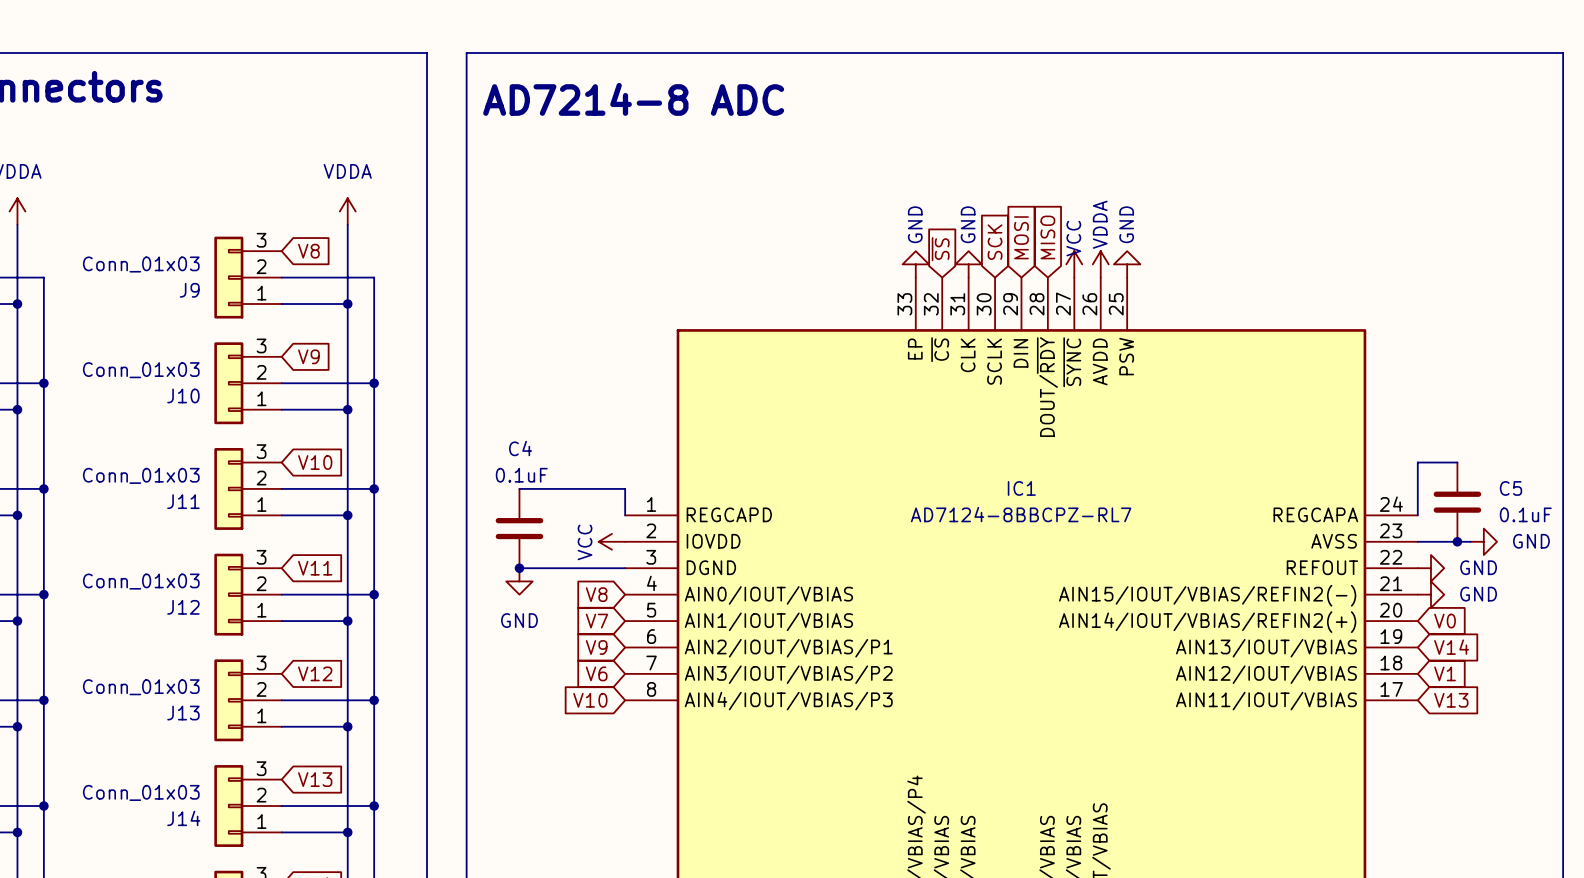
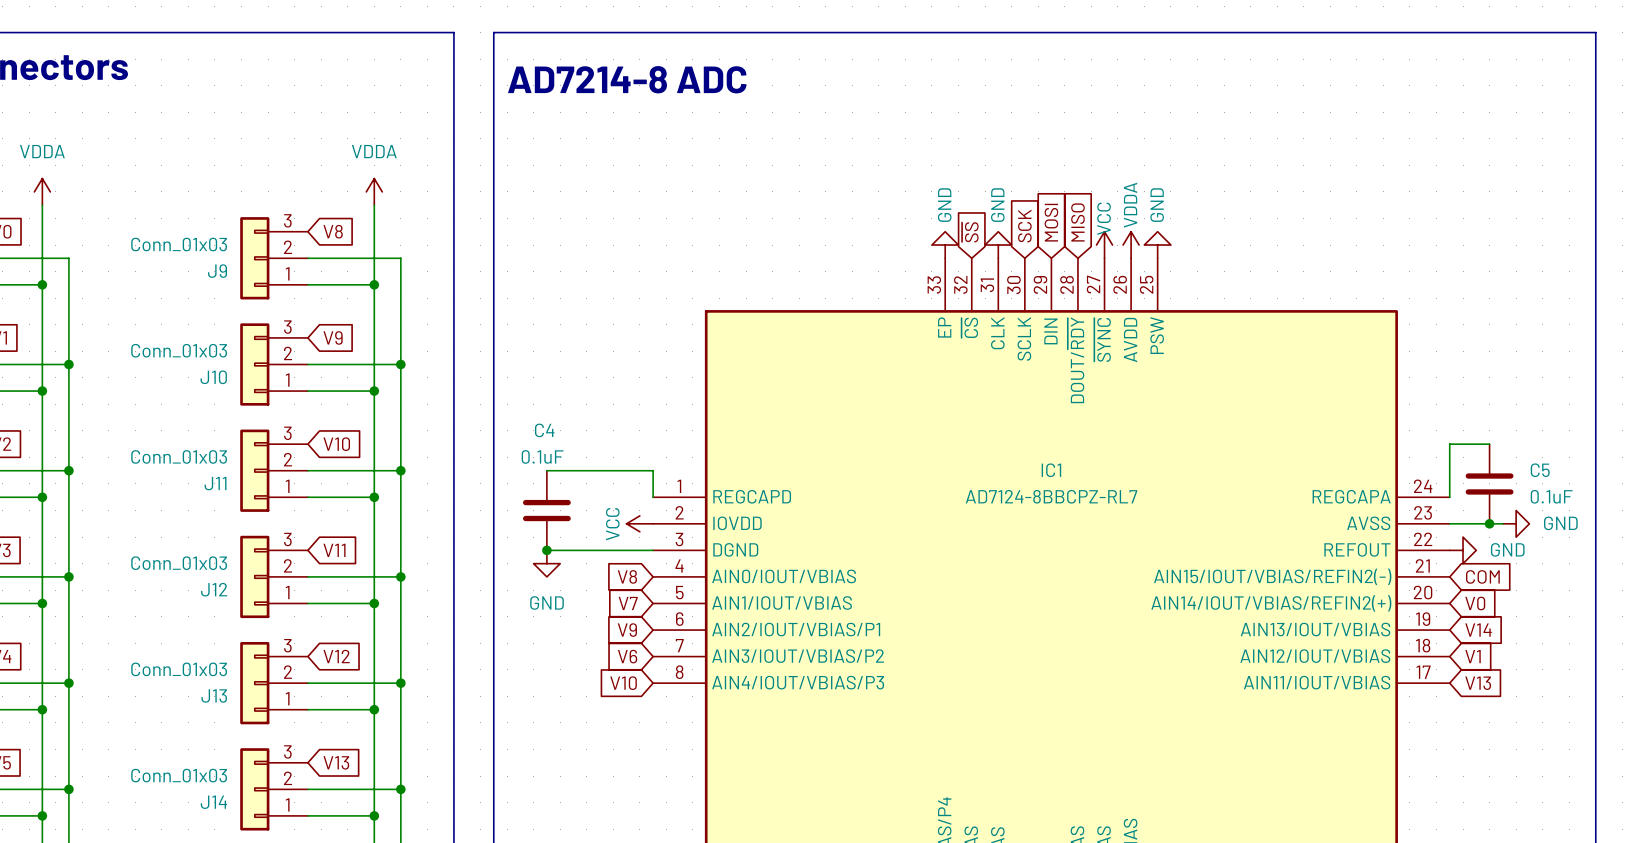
power symbol: GND (1431, 594) -> none
global label: none -> COM (1482, 576)

